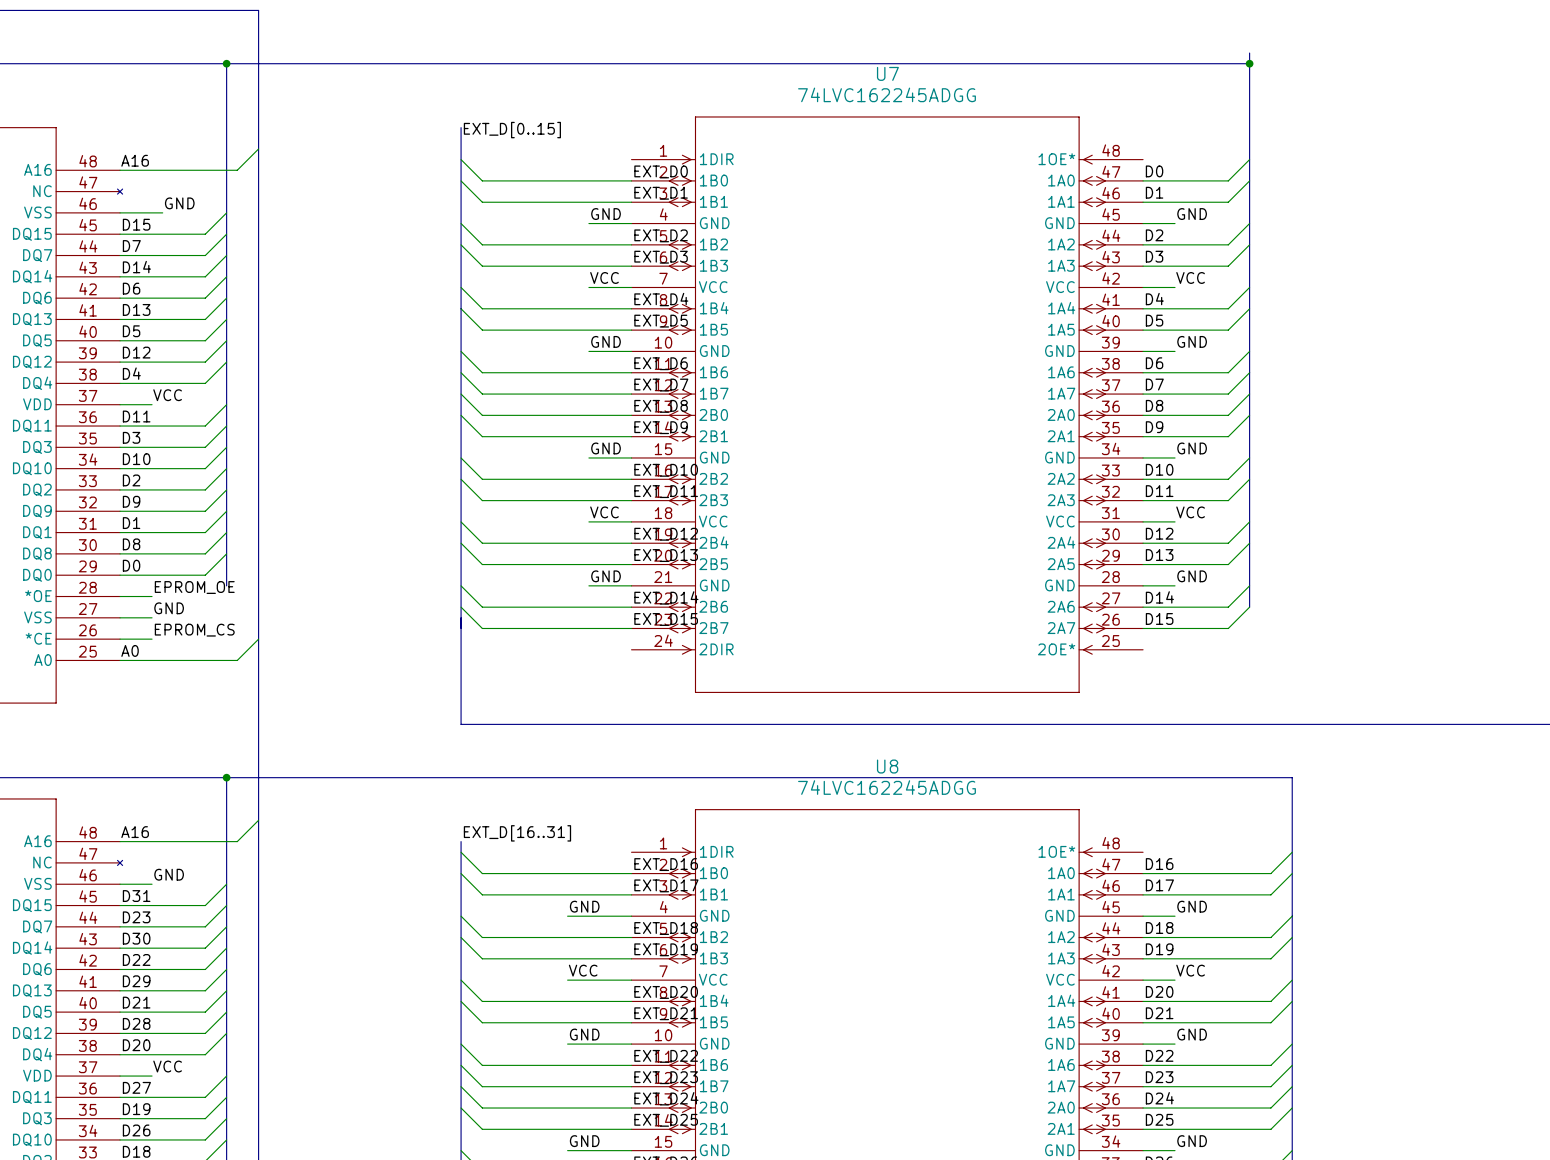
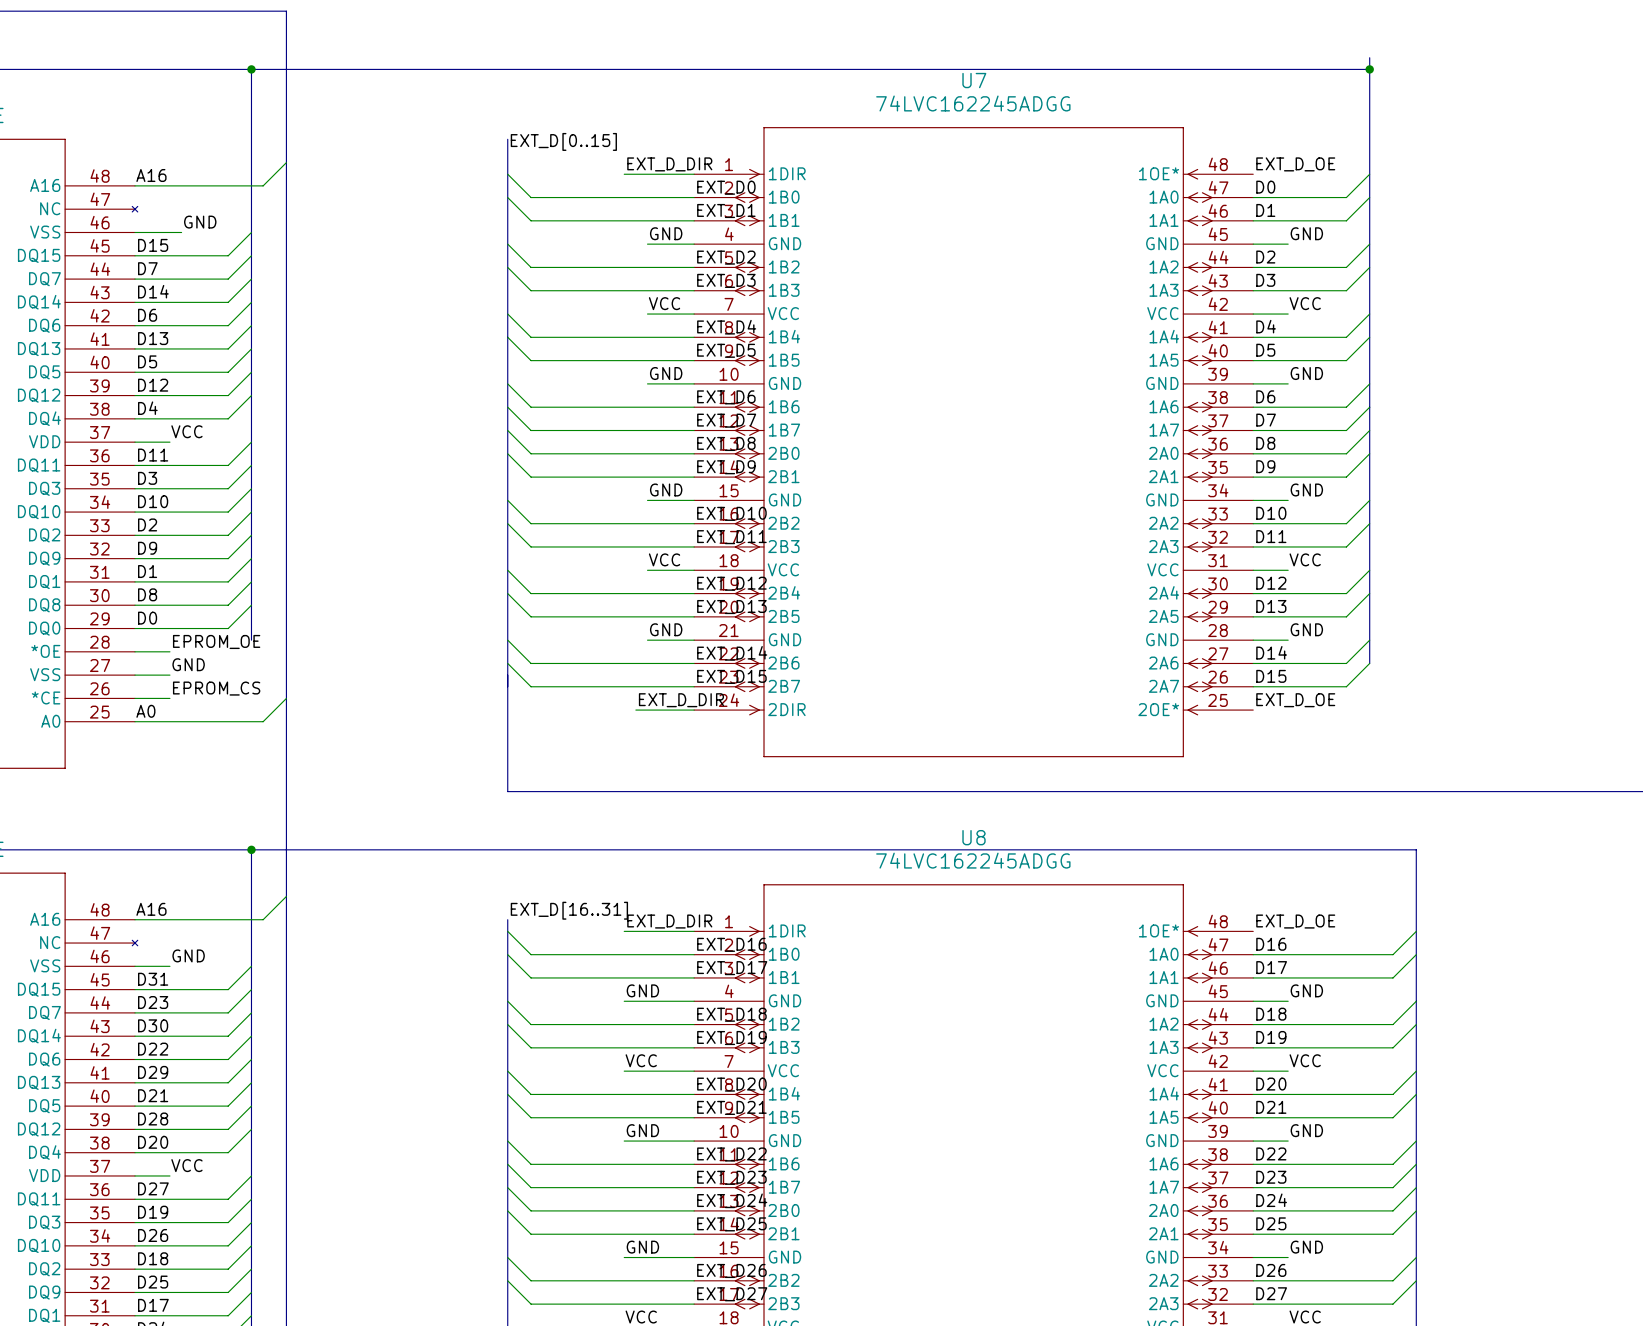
label: none -> EXT_D_DIR (669, 164)
label: none -> EXT_D_OE (1295, 164)
wire: none -> (624, 174) (694, 174)
label: none -> EXT_D_DIR (681, 700)
label: none -> EXT_D_OE (1295, 700)
wire: none -> (635, 710) (694, 710)
label: none -> EXT_D_DIR (669, 921)
label: none -> EXT_D_OE (1295, 921)
wire: none -> (624, 931) (694, 931)

